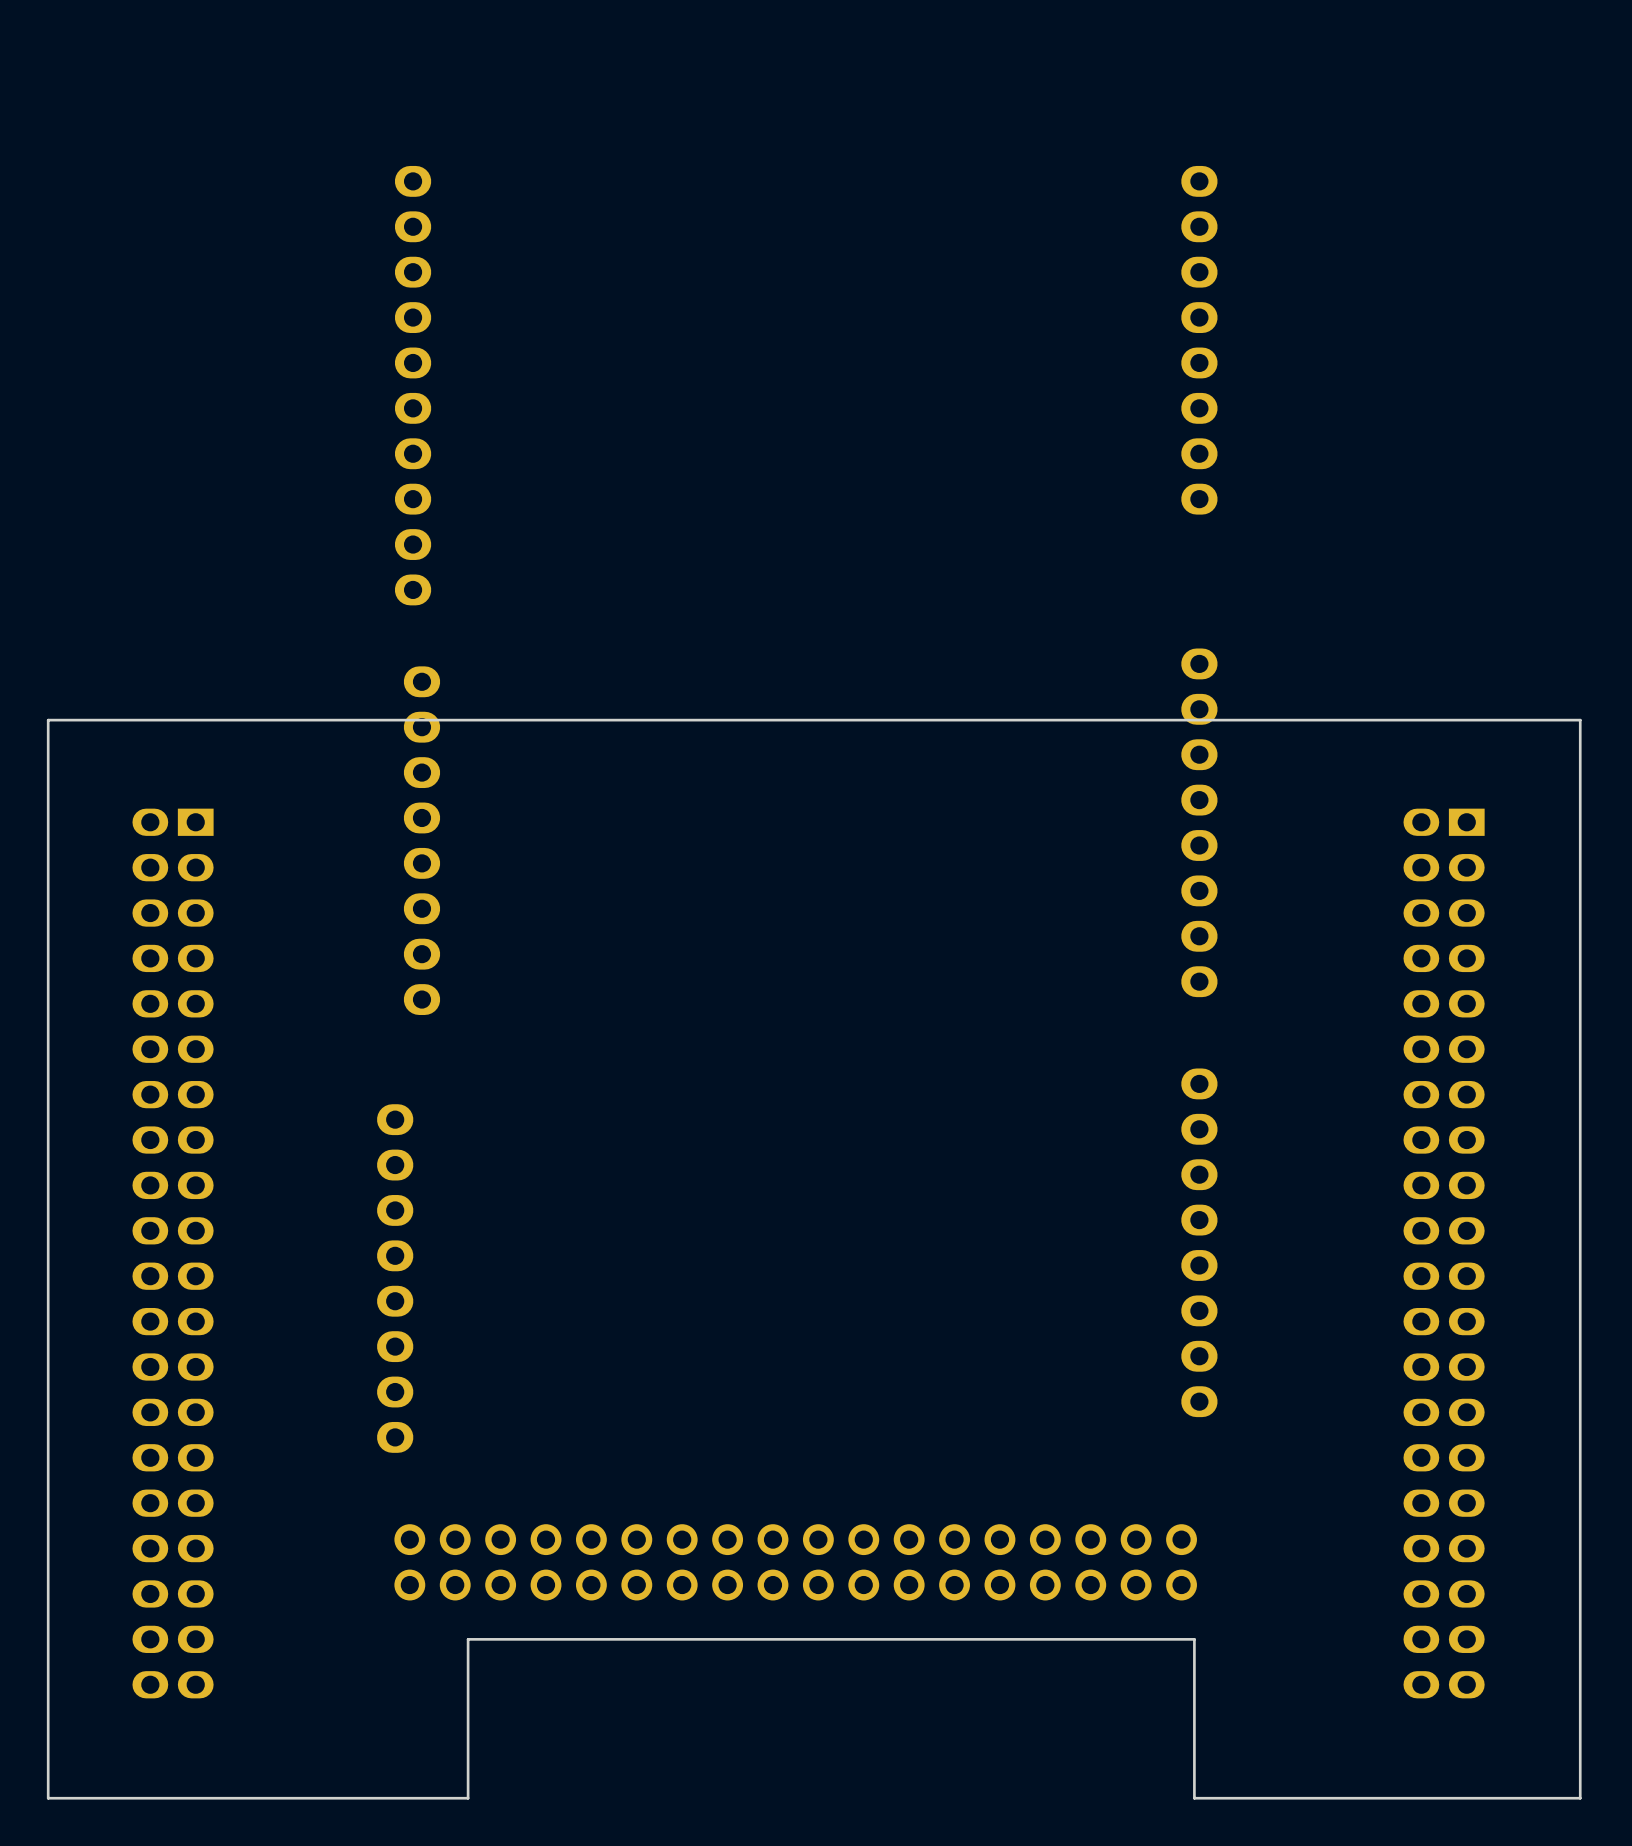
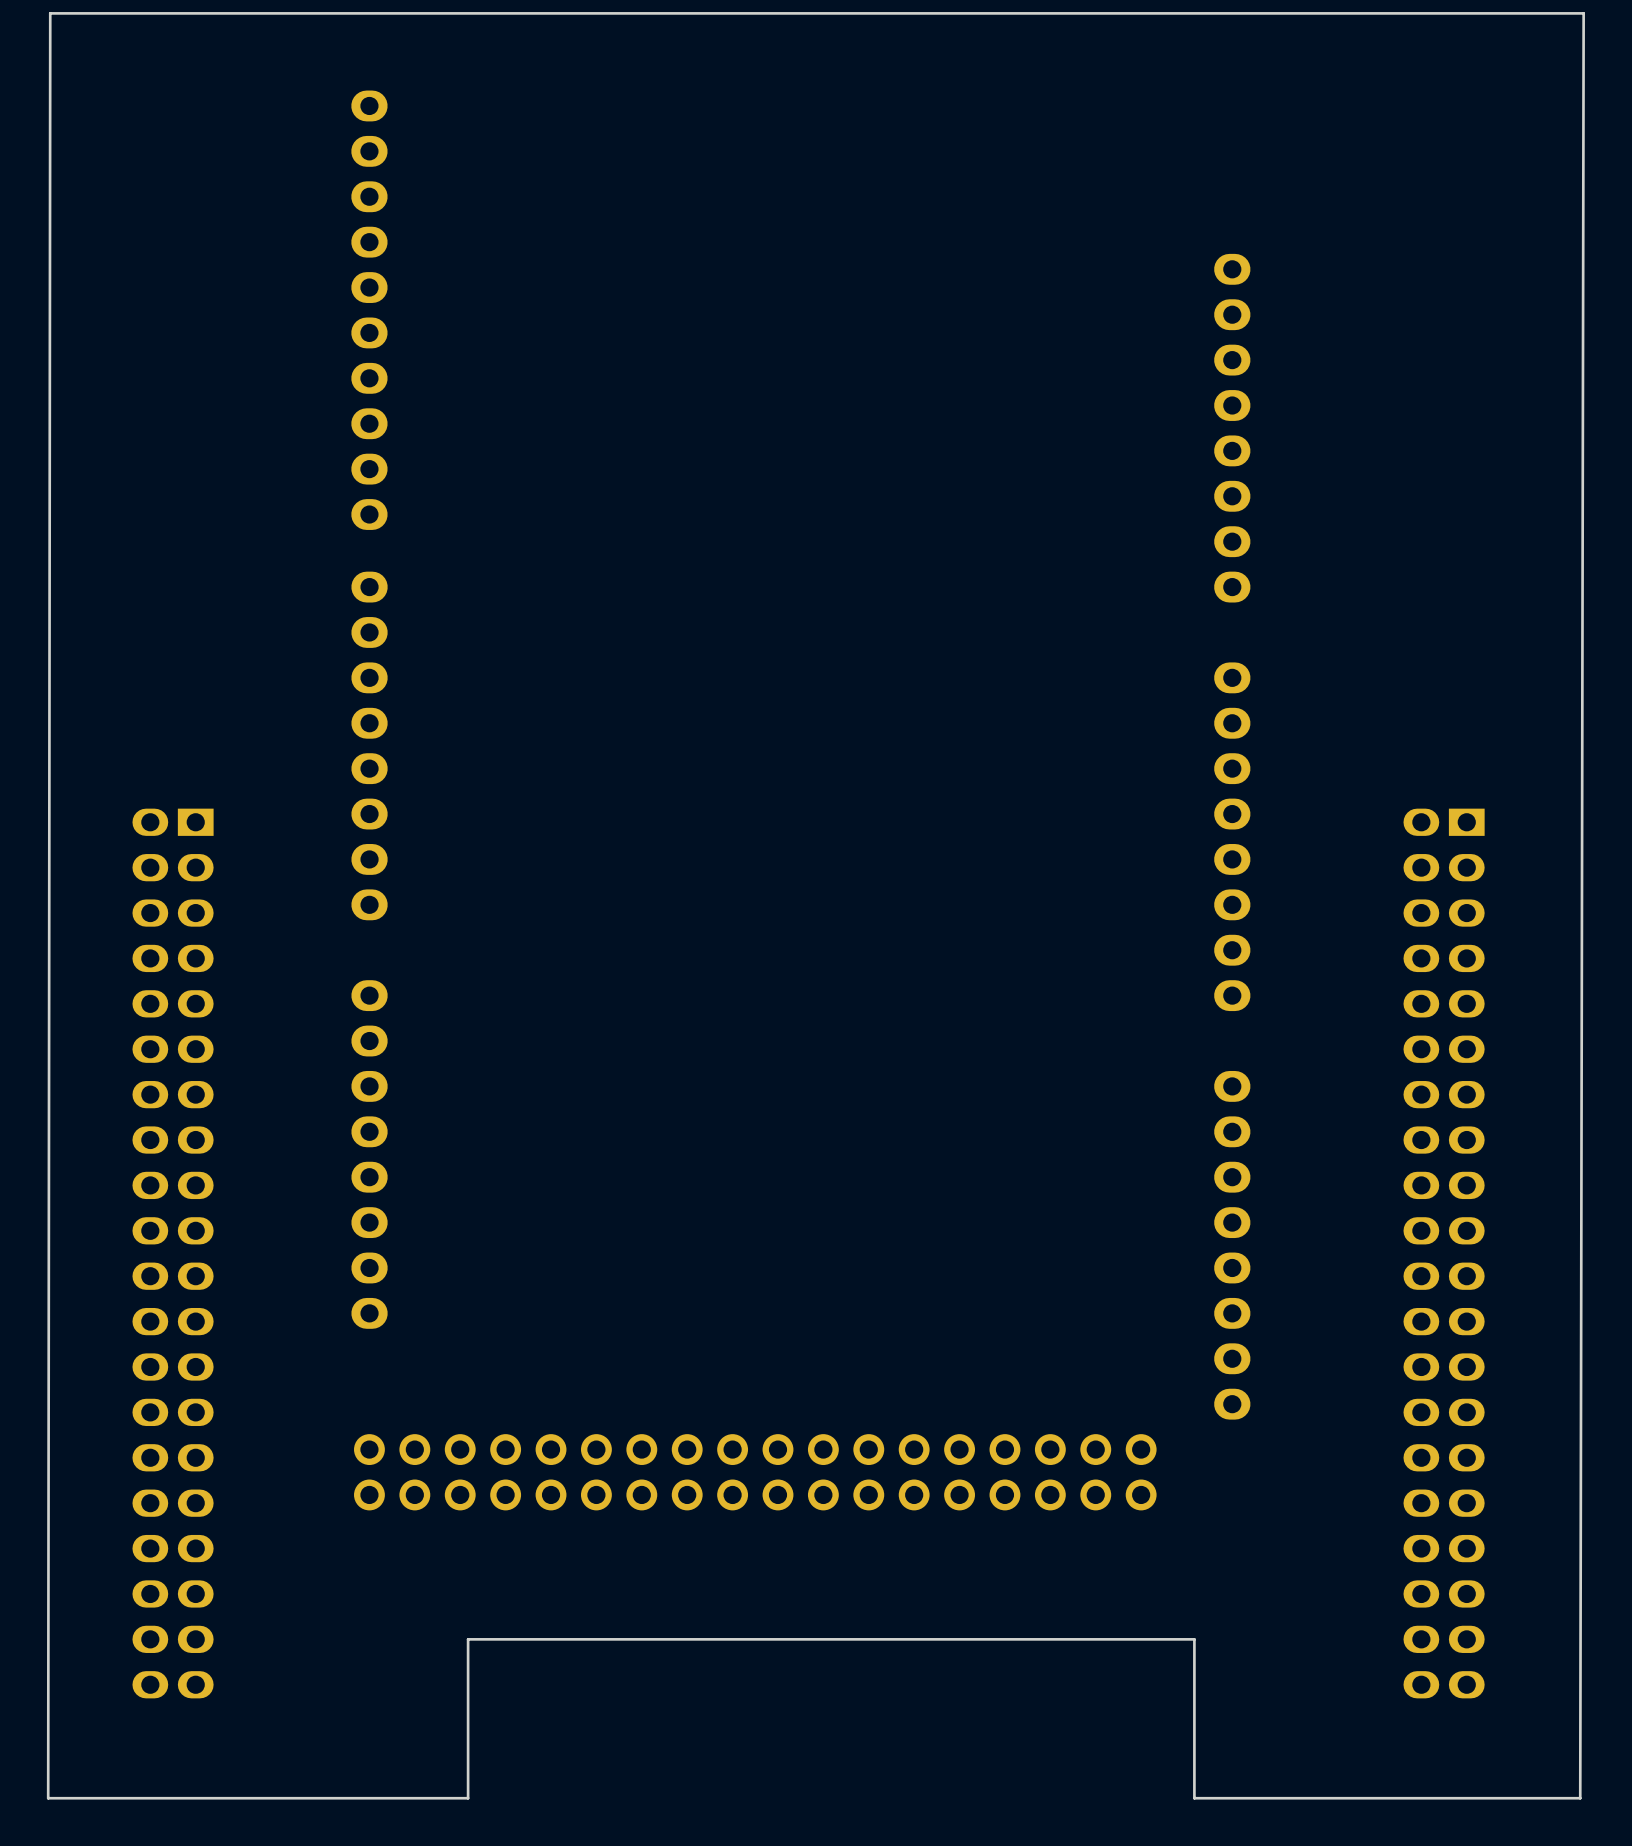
part position: (1199, 340) -> (1232, 428)
part position: (413, 385) -> (369, 310)
part position: (1199, 822) -> (1232, 836)
part position: (421, 840) -> (369, 745)
part position: (1199, 1242) -> (1232, 1245)
part position: (395, 1278) -> (369, 1154)
part position: (795, 1562) -> (755, 1472)
board edge: (1580, 1798) (1580, 720) (48, 720) (48, 1798) -> (1580, 1798) (1583, 13) (50, 13) (48, 1798)

